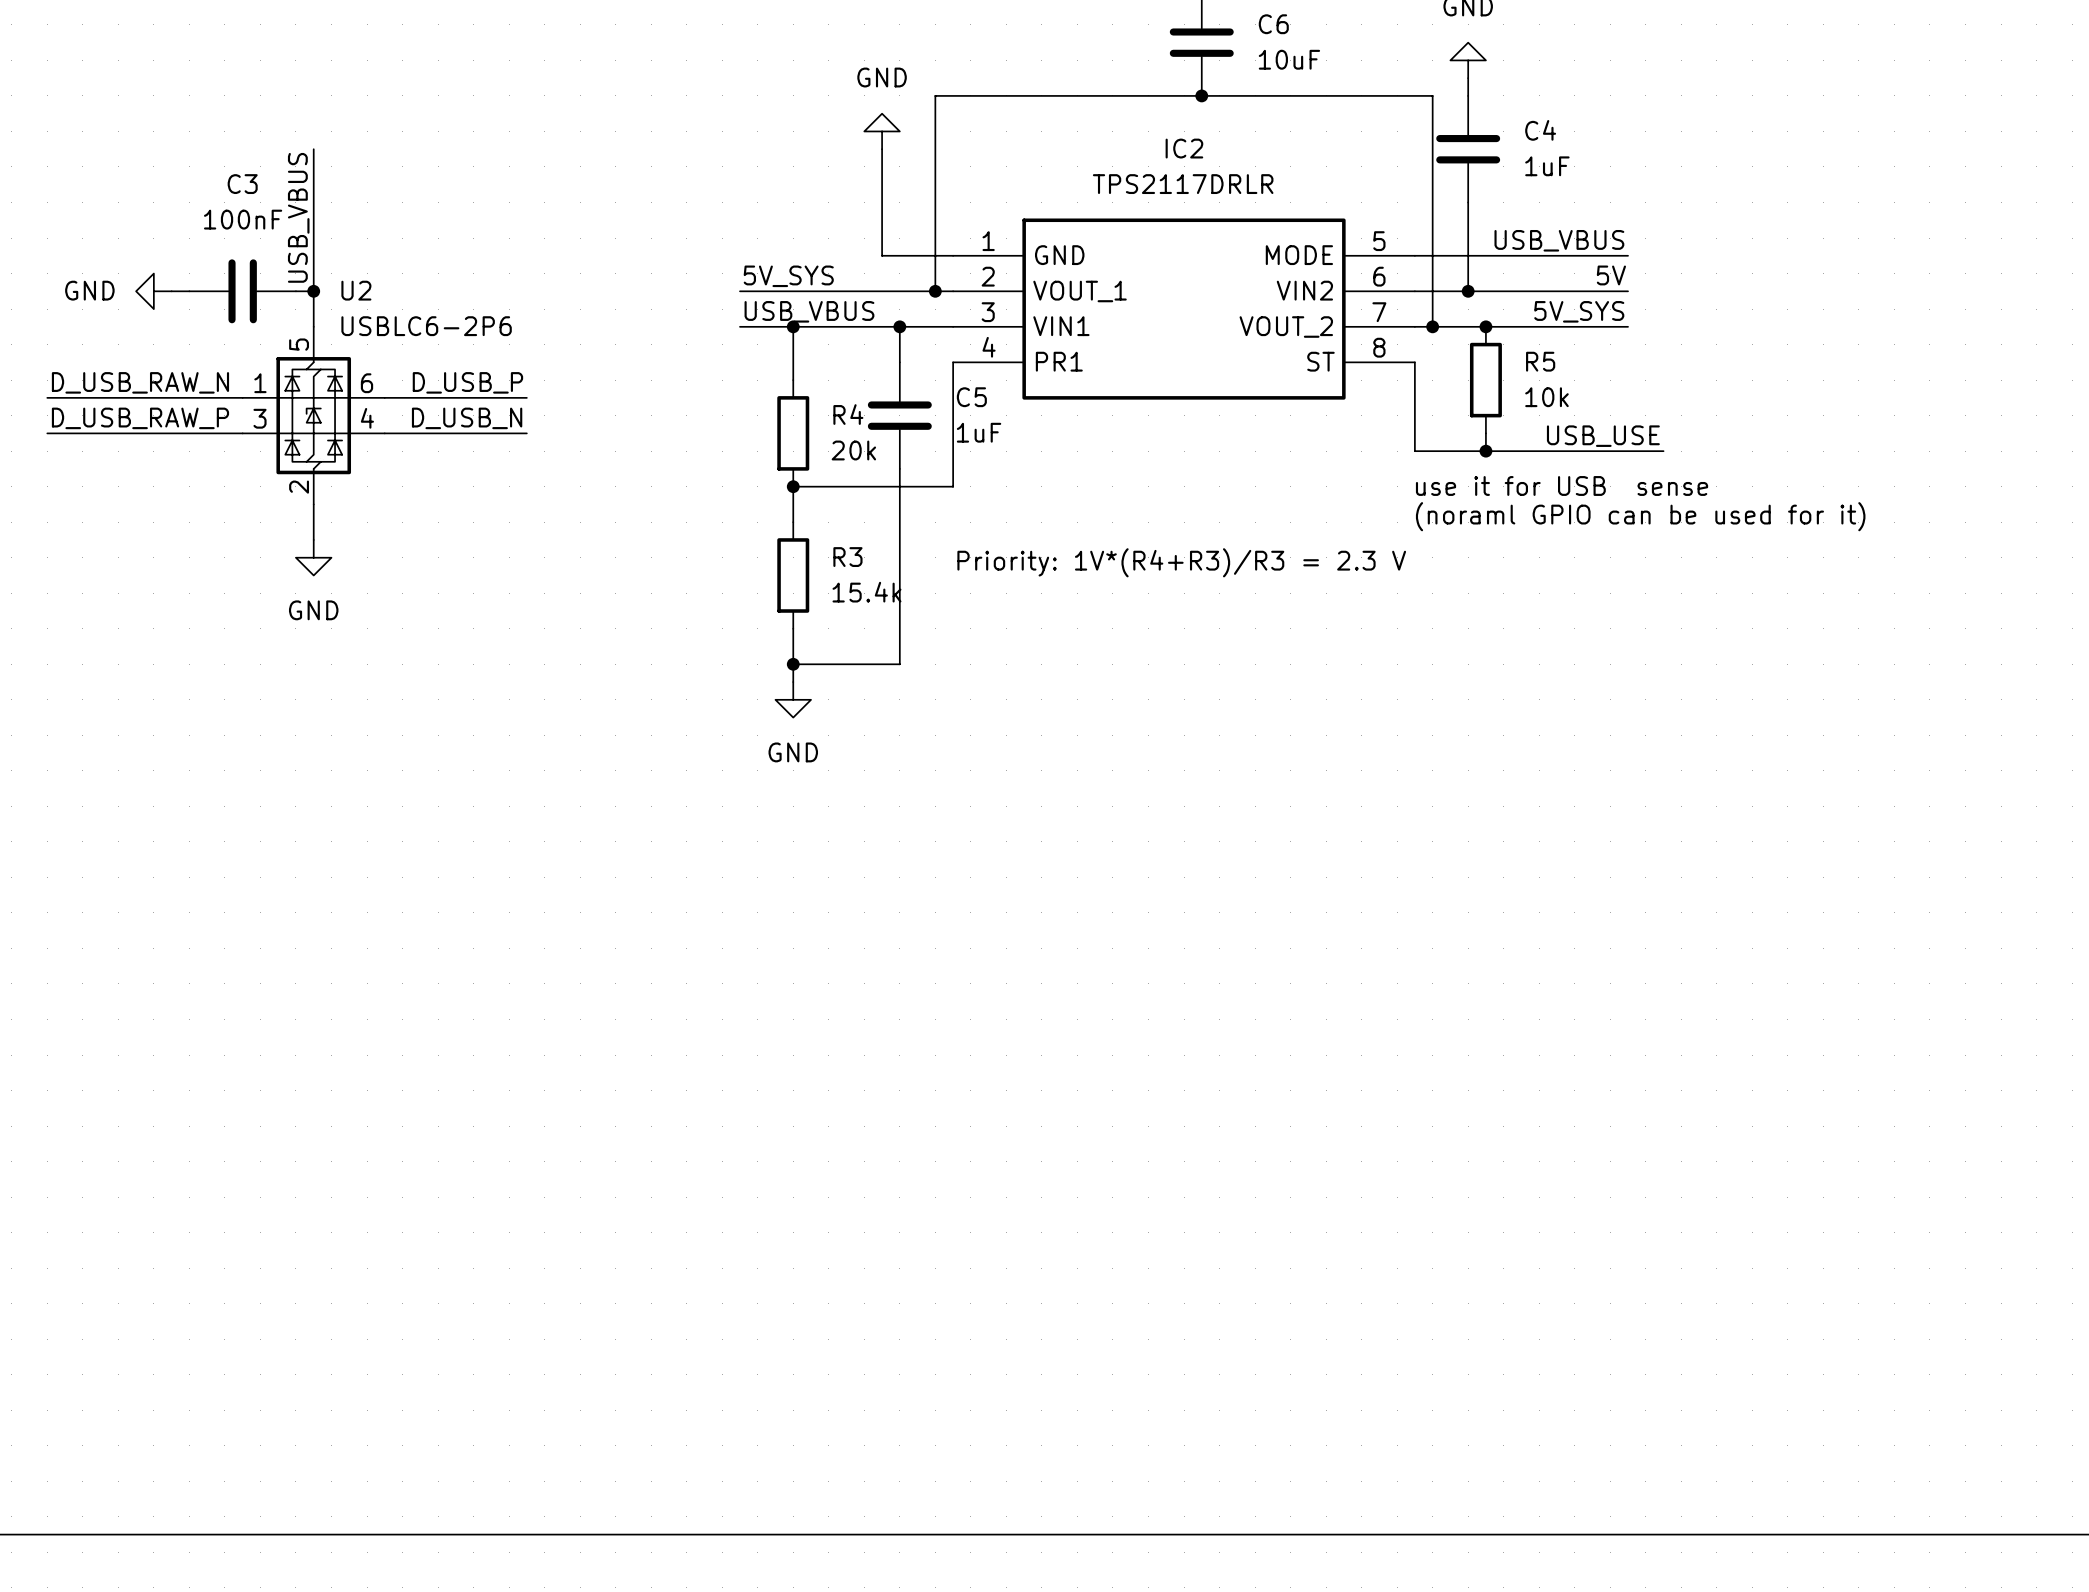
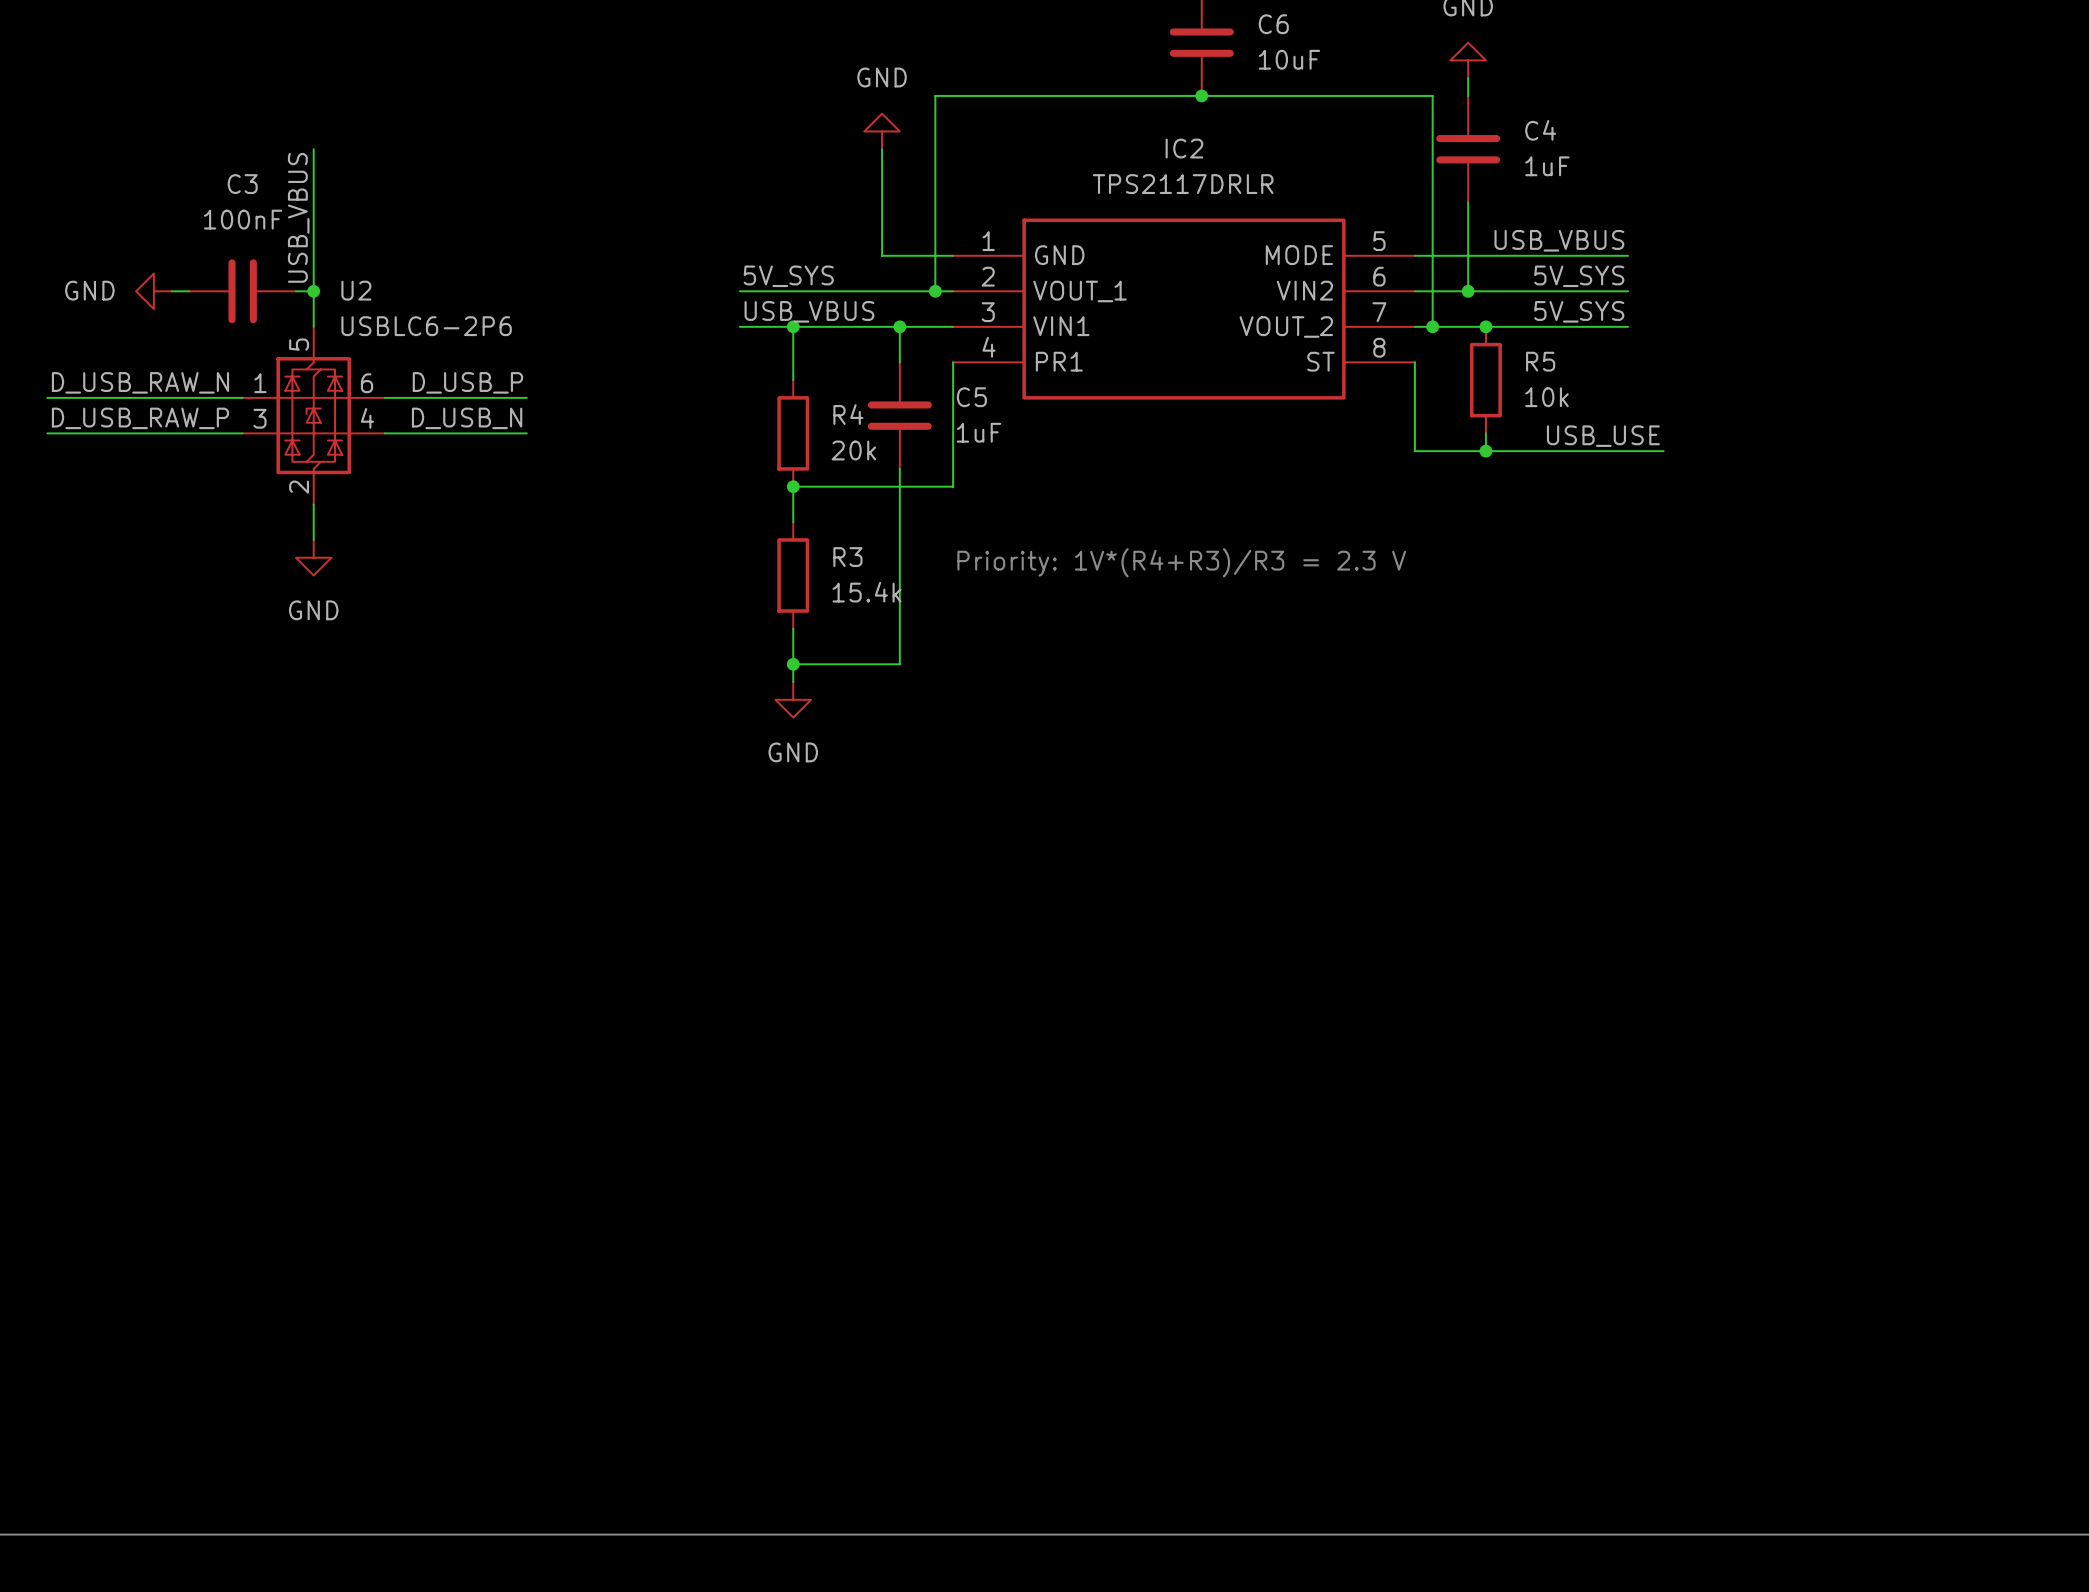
label: 5V (1611, 275) -> 5V_SYS (1579, 276)
text: use it for USB sense (1562, 485) -> none
text: (noraml GPIO can be used for it) (1640, 516) -> none

